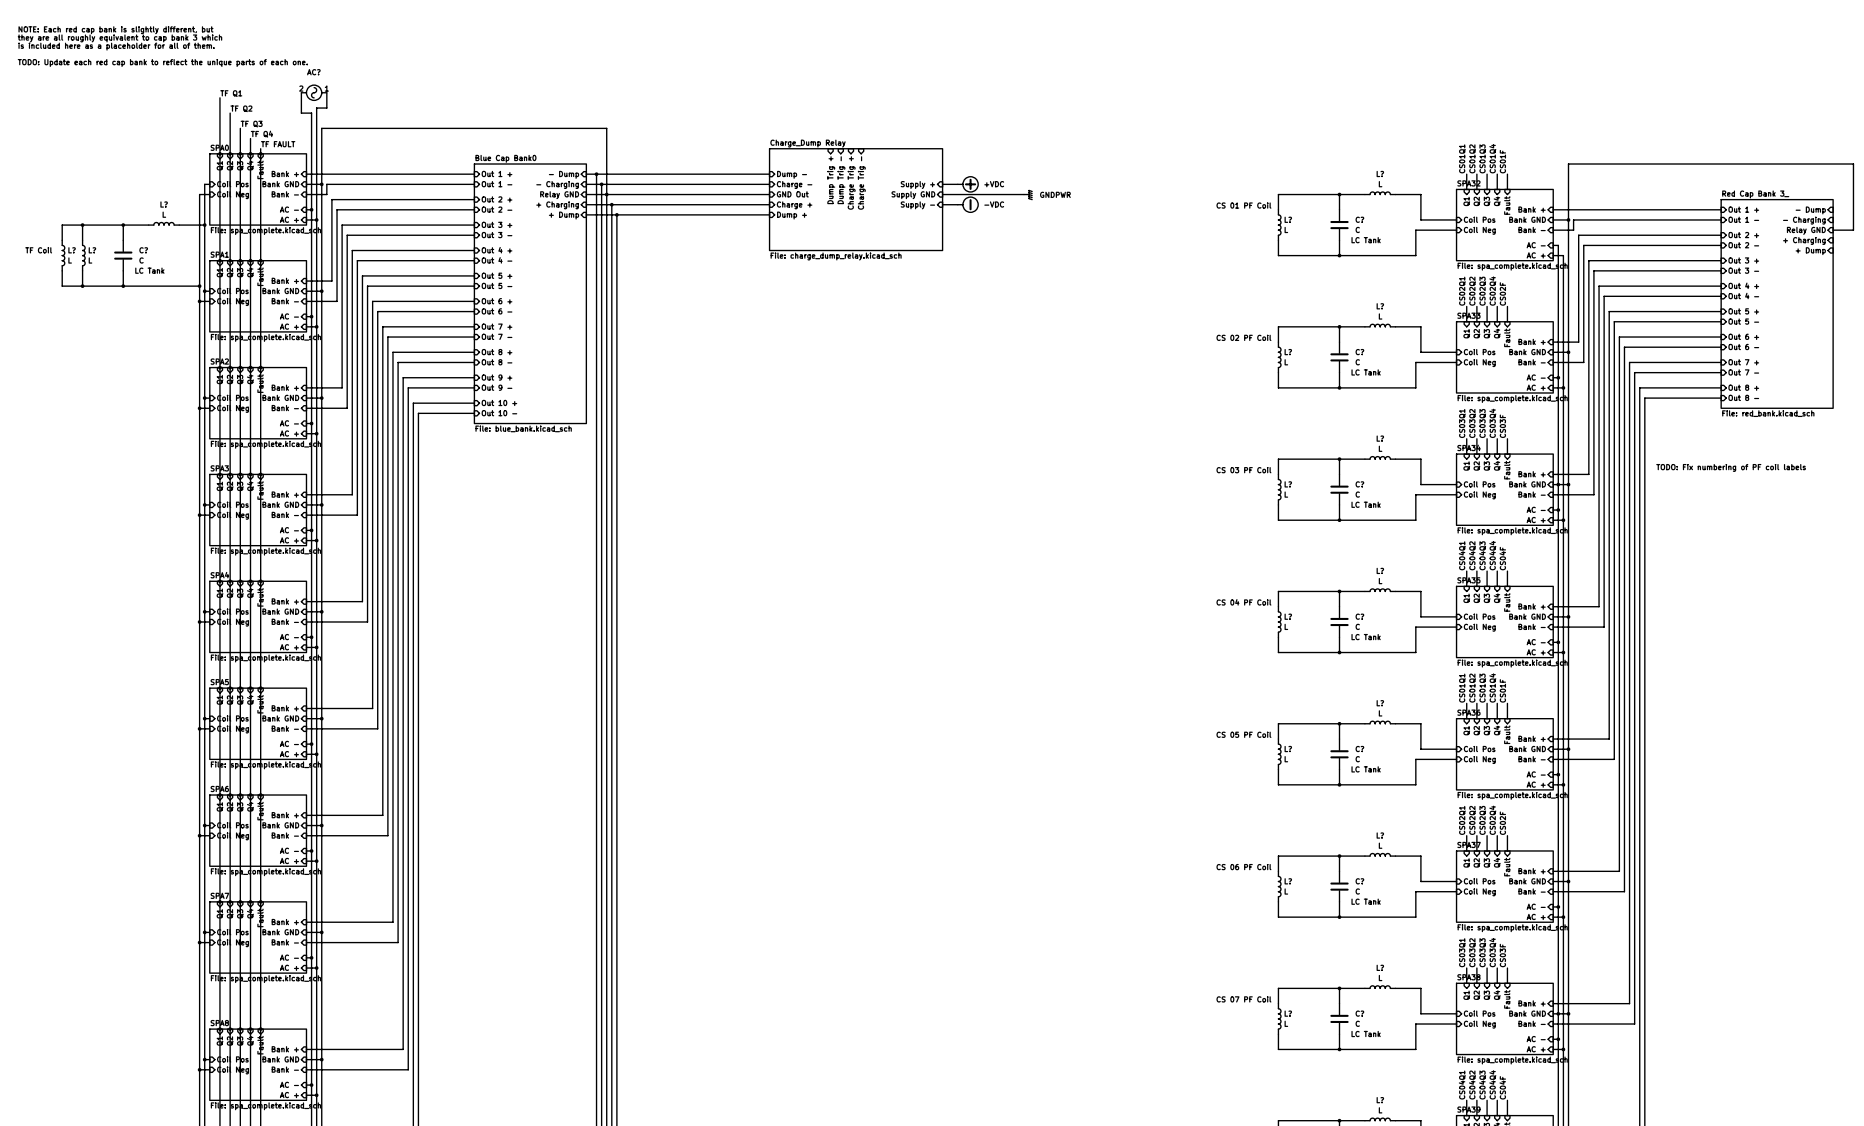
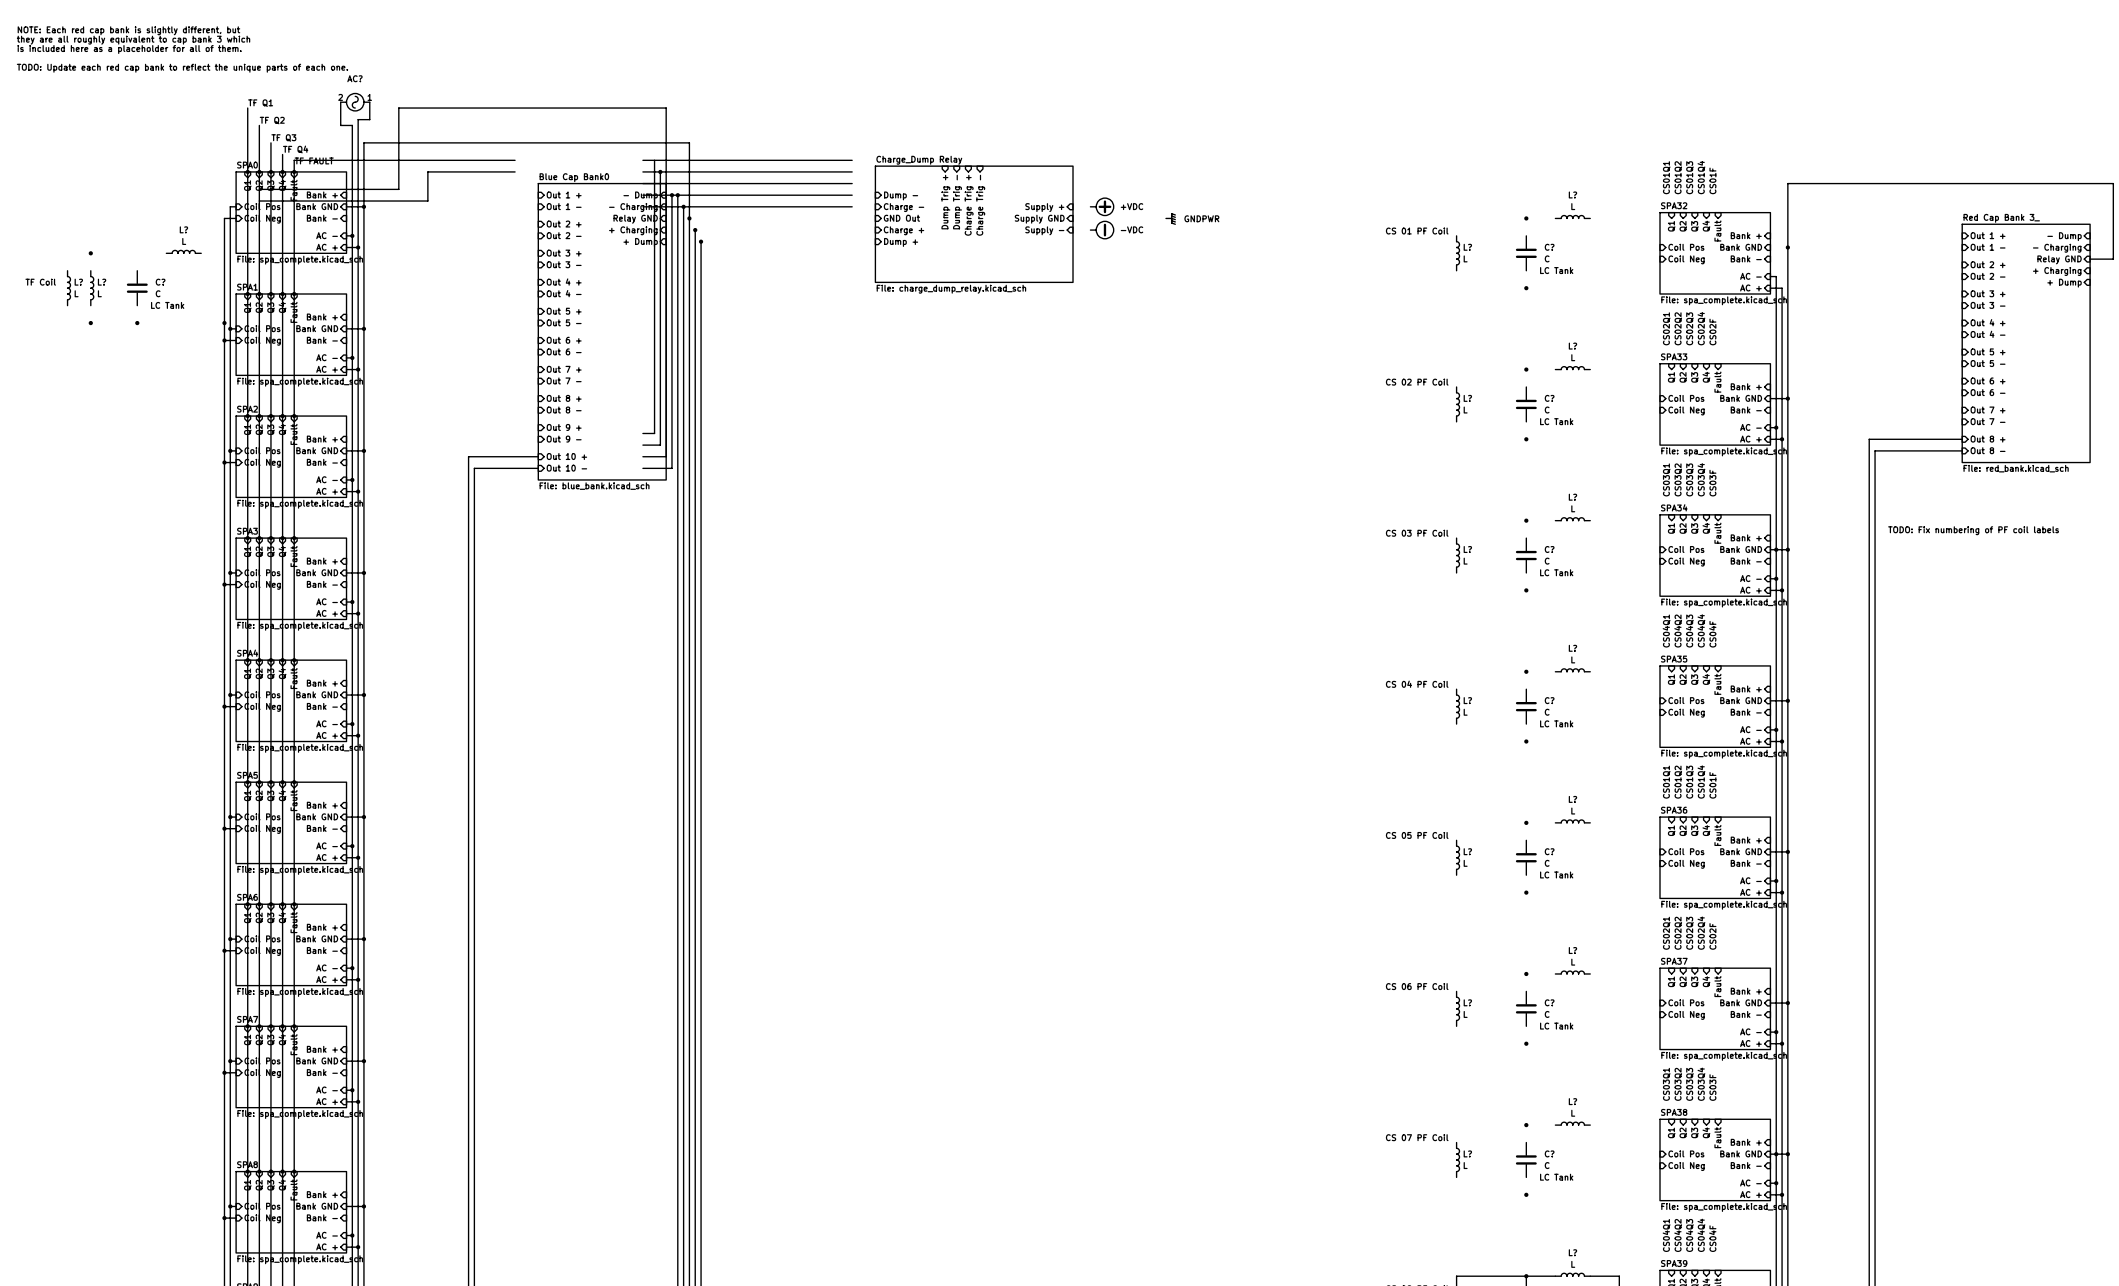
wire: none -> (515, 160) (294, 160) (294, 166)
wire: none -> (654, 160) (654, 433) (642, 433)
wire: none -> (515, 171) (427, 171) (427, 201) (259, 201)
wire: none -> (660, 171) (660, 445) (642, 445)
junction: none -> (660, 171)
wire: none -> (259, 189) (398, 189) (398, 108) (666, 108) (666, 456) (642, 456)
wire: (306, 174) (474, 174) -> none
wire: none -> (642, 195) (666, 195)
wire: none -> (671, 195) (671, 468) (642, 468)
junction: none -> (671, 195)
wire: (749, 174) (769, 174) -> none
wire: (1466, 174) (1466, 189) -> none
wire: (1476, 174) (1476, 189) -> none
wire: (1487, 174) (1487, 189) -> none
wire: (1497, 174) (1497, 189) -> none
wire: (1507, 174) (1507, 189) -> none
wire: (474, 184) (326, 184) (326, 194) (306, 194) -> none
wire: none -> (642, 206) (666, 206)
wire: (749, 184) (769, 184) -> none
wire: (942, 184) (957, 184) -> none
wire: (586, 194) (769, 194) -> (642, 160) (852, 160)
wire: (942, 194) (1023, 194) -> none
wire: (1339, 194) (1339, 209) -> none
wire: (1364, 194) (1278, 194) (1278, 209) -> none
wire: (1395, 194) (1420, 194) (1420, 219) (1456, 219) -> none
wire: (474, 199) (331, 199) (331, 281) (306, 281) -> none
wire: (586, 204) (769, 204) -> (642, 171) (852, 171)
wire: (942, 204) (957, 204) -> none
wire: (474, 209) (337, 209) (337, 301) (306, 301) -> none
wire: (1553, 209) (1721, 209) -> none
wire: (586, 214) (769, 214) -> (642, 183) (852, 183)
wire: (1553, 219) (1568, 219) -> none
wire: (1721, 219) (1573, 219) (1573, 230) (1553, 230) -> none
wire: (82, 225) (82, 240) -> none
wire: (123, 225) (123, 240) -> none
junction: (123, 225) -> none
wire: (148, 225) (62, 225) (62, 240) -> none
wire: (179, 225) (204, 225) -> none
junction: (204, 225) -> none
wire: (474, 225) (342, 225) (342, 387) (306, 387) -> none
wire: (1456, 230) (1415, 230) (1415, 255) (1278, 255) (1278, 240) -> none
wire: (474, 235) (347, 235) (347, 408) (306, 408) -> none
wire: (1721, 235) (1578, 235) (1578, 342) (1553, 342) -> none
wire: (1339, 240) (1339, 255) -> none
wire: (1721, 245) (1583, 245) (1583, 362) (1553, 362) -> none
wire: (474, 250) (352, 250) (352, 494) (306, 494) -> none
wire: (474, 260) (357, 260) (357, 515) (306, 515) -> none
wire: (1721, 260) (1588, 260) (1588, 474) (1553, 474) -> none
wire: (62, 270) (62, 286) (199, 286) -> none
wire: (82, 270) (82, 286) -> none
wire: (123, 270) (123, 286) -> none
wire: (1721, 270) (1593, 270) (1593, 494) (1553, 494) -> none
wire: (474, 275) (362, 275) (362, 601) (306, 601) -> none
wire: (474, 286) (367, 286) (367, 621) (306, 621) -> none
wire: (1721, 286) (1599, 286) (1599, 606) (1553, 606) -> none
wire: (1721, 296) (1604, 296) (1604, 627) (1553, 627) -> none
wire: (474, 301) (372, 301) (372, 708) (306, 708) -> none
wire: (1466, 306) (1466, 321) -> none
wire: (1476, 306) (1476, 321) -> none
wire: (1487, 306) (1487, 321) -> none
wire: (1497, 306) (1497, 321) -> none
wire: (1507, 306) (1507, 321) -> none
wire: (474, 311) (377, 311) (377, 728) (306, 728) -> none
wire: (1721, 311) (1609, 311) (1609, 739) (1553, 739) -> none
wire: (1721, 321) (1614, 321) (1614, 759) (1553, 759) -> none
wire: (474, 326) (382, 326) (382, 815) (306, 815) -> none
wire: (1339, 326) (1339, 342) -> none
wire: (1364, 326) (1278, 326) (1278, 342) -> none
wire: (1395, 326) (1420, 326) (1420, 352) (1456, 352) -> none
wire: (474, 337) (387, 337) (387, 835) (306, 835) -> none
wire: (1721, 337) (1619, 337) (1619, 871) (1553, 871) -> none
wire: (1721, 347) (1624, 347) (1624, 891) (1553, 891) -> none
wire: (474, 352) (392, 352) (392, 922) (306, 922) -> none
wire: (474, 362) (398, 362) (398, 942) (306, 942) -> none
wire: (1456, 362) (1415, 362) (1415, 387) (1278, 387) (1278, 372) -> none
wire: (1721, 362) (1629, 362) (1629, 1003) (1553, 1003) -> none
wire: (1339, 372) (1339, 387) -> none
wire: (1721, 372) (1634, 372) (1634, 1024) (1553, 1024) -> none
wire: (474, 377) (403, 377) (403, 1049) (306, 1049) -> none
wire: (474, 387) (408, 387) (408, 1069) (306, 1069) -> none
wire: (1466, 438) (1466, 454) -> none
wire: (1476, 438) (1476, 454) -> none
wire: (1487, 438) (1487, 454) -> none
wire: (1497, 438) (1497, 454) -> none
wire: (1507, 438) (1507, 454) -> none
wire: (1339, 459) (1339, 474) -> none
wire: (1364, 459) (1278, 459) (1278, 474) -> none
wire: (1395, 459) (1420, 459) (1420, 484) (1456, 484) -> none
wire: (1456, 494) (1415, 494) (1415, 520) (1278, 520) (1278, 504) -> none
wire: (1339, 504) (1339, 520) -> none
wire: (1466, 571) (1466, 586) -> none
wire: (1476, 571) (1476, 586) -> none
wire: (1487, 571) (1487, 586) -> none
wire: (1497, 571) (1497, 586) -> none
wire: (1507, 571) (1507, 586) -> none
wire: (1339, 591) (1339, 606) -> none
wire: (1364, 591) (1278, 591) (1278, 606) -> none
wire: (1395, 591) (1420, 591) (1420, 616) (1456, 616) -> none
wire: (1456, 627) (1415, 627) (1415, 652) (1278, 652) (1278, 637) -> none
wire: (1339, 637) (1339, 652) -> none
wire: (1466, 703) (1466, 718) -> none
wire: (1476, 703) (1476, 718) -> none
wire: (1487, 703) (1487, 718) -> none
wire: (1497, 703) (1497, 718) -> none
wire: (1507, 703) (1507, 718) -> none
wire: (1339, 723) (1339, 739) -> none
wire: (1364, 723) (1278, 723) (1278, 739) -> none
wire: (1395, 723) (1420, 723) (1420, 749) (1456, 749) -> none
wire: (1456, 759) (1415, 759) (1415, 784) (1278, 784) (1278, 769) -> none
wire: (1339, 769) (1339, 784) -> none
wire: (1466, 835) (1466, 850) -> none
wire: (1476, 835) (1476, 850) -> none
wire: (1487, 835) (1487, 850) -> none
wire: (1497, 835) (1497, 850) -> none
wire: (1507, 835) (1507, 850) -> none
wire: (1339, 856) (1339, 871) -> none
wire: (1364, 856) (1278, 856) (1278, 871) -> none
wire: (1395, 856) (1420, 856) (1420, 881) (1456, 881) -> none
wire: (1456, 891) (1415, 891) (1415, 917) (1278, 917) (1278, 901) -> none
wire: (1339, 901) (1339, 917) -> none
wire: (1466, 968) (1466, 983) -> none
wire: (1476, 968) (1476, 983) -> none
wire: (1487, 968) (1487, 983) -> none
wire: (1497, 968) (1497, 983) -> none
wire: (1507, 968) (1507, 983) -> none
wire: (1339, 988) (1339, 1003) -> none
wire: (1364, 988) (1278, 988) (1278, 1003) -> none
wire: (1395, 988) (1420, 988) (1420, 1013) (1456, 1013) -> none
wire: (1456, 1024) (1415, 1024) (1415, 1049) (1278, 1049) (1278, 1034) -> none
wire: (1339, 1034) (1339, 1049) -> none
wire: (1466, 1100) (1466, 1115) -> none
wire: (1476, 1100) (1476, 1115) -> none
wire: (1487, 1100) (1487, 1115) -> none
wire: (1497, 1100) (1497, 1115) -> none
wire: (1507, 1100) (1507, 1115) -> none

